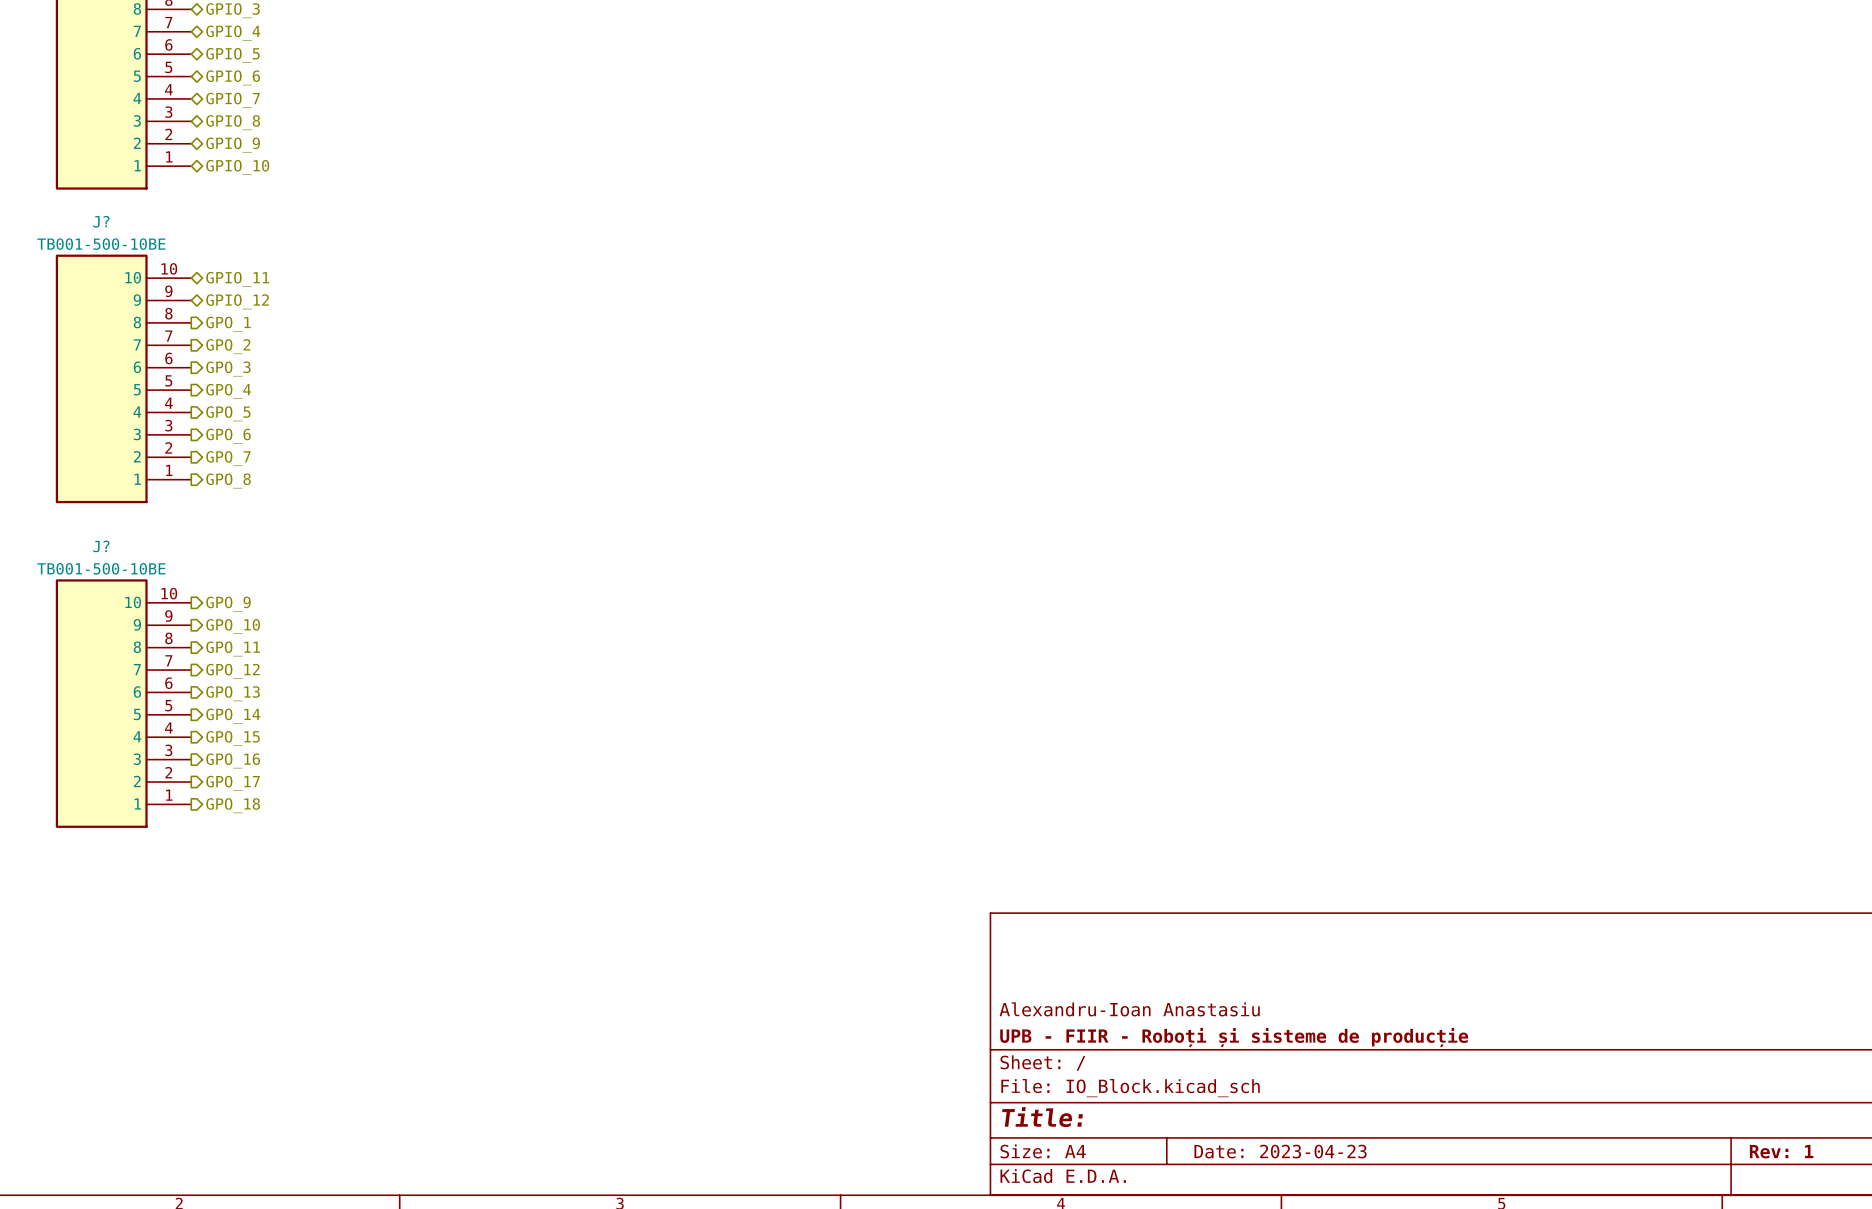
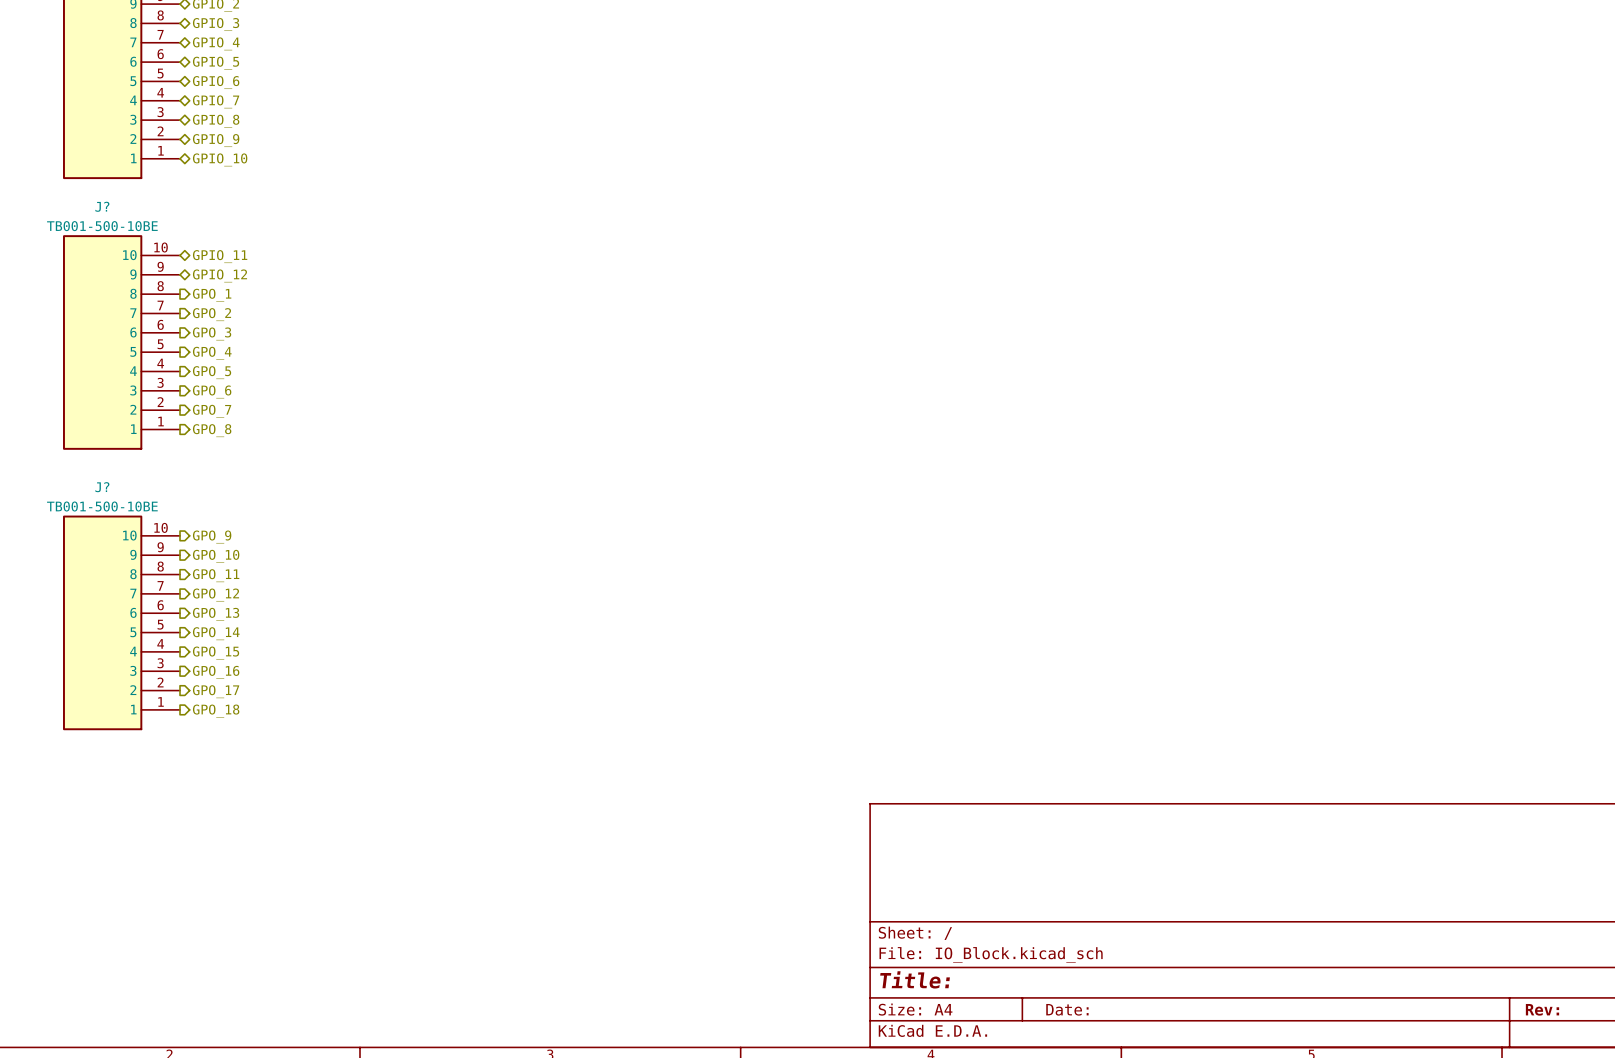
title block: Alexandru-Ioan Anastasiu (1129, 1009) -> none
title block: UPB - FIIR - Roboți și sisteme de producție (1234, 1037) -> none
title block: Date: 2023-04-23 (1280, 1151) -> Date: (1067, 1009)
title block: Rev: 1 (1781, 1151) -> Rev: (1542, 1009)

